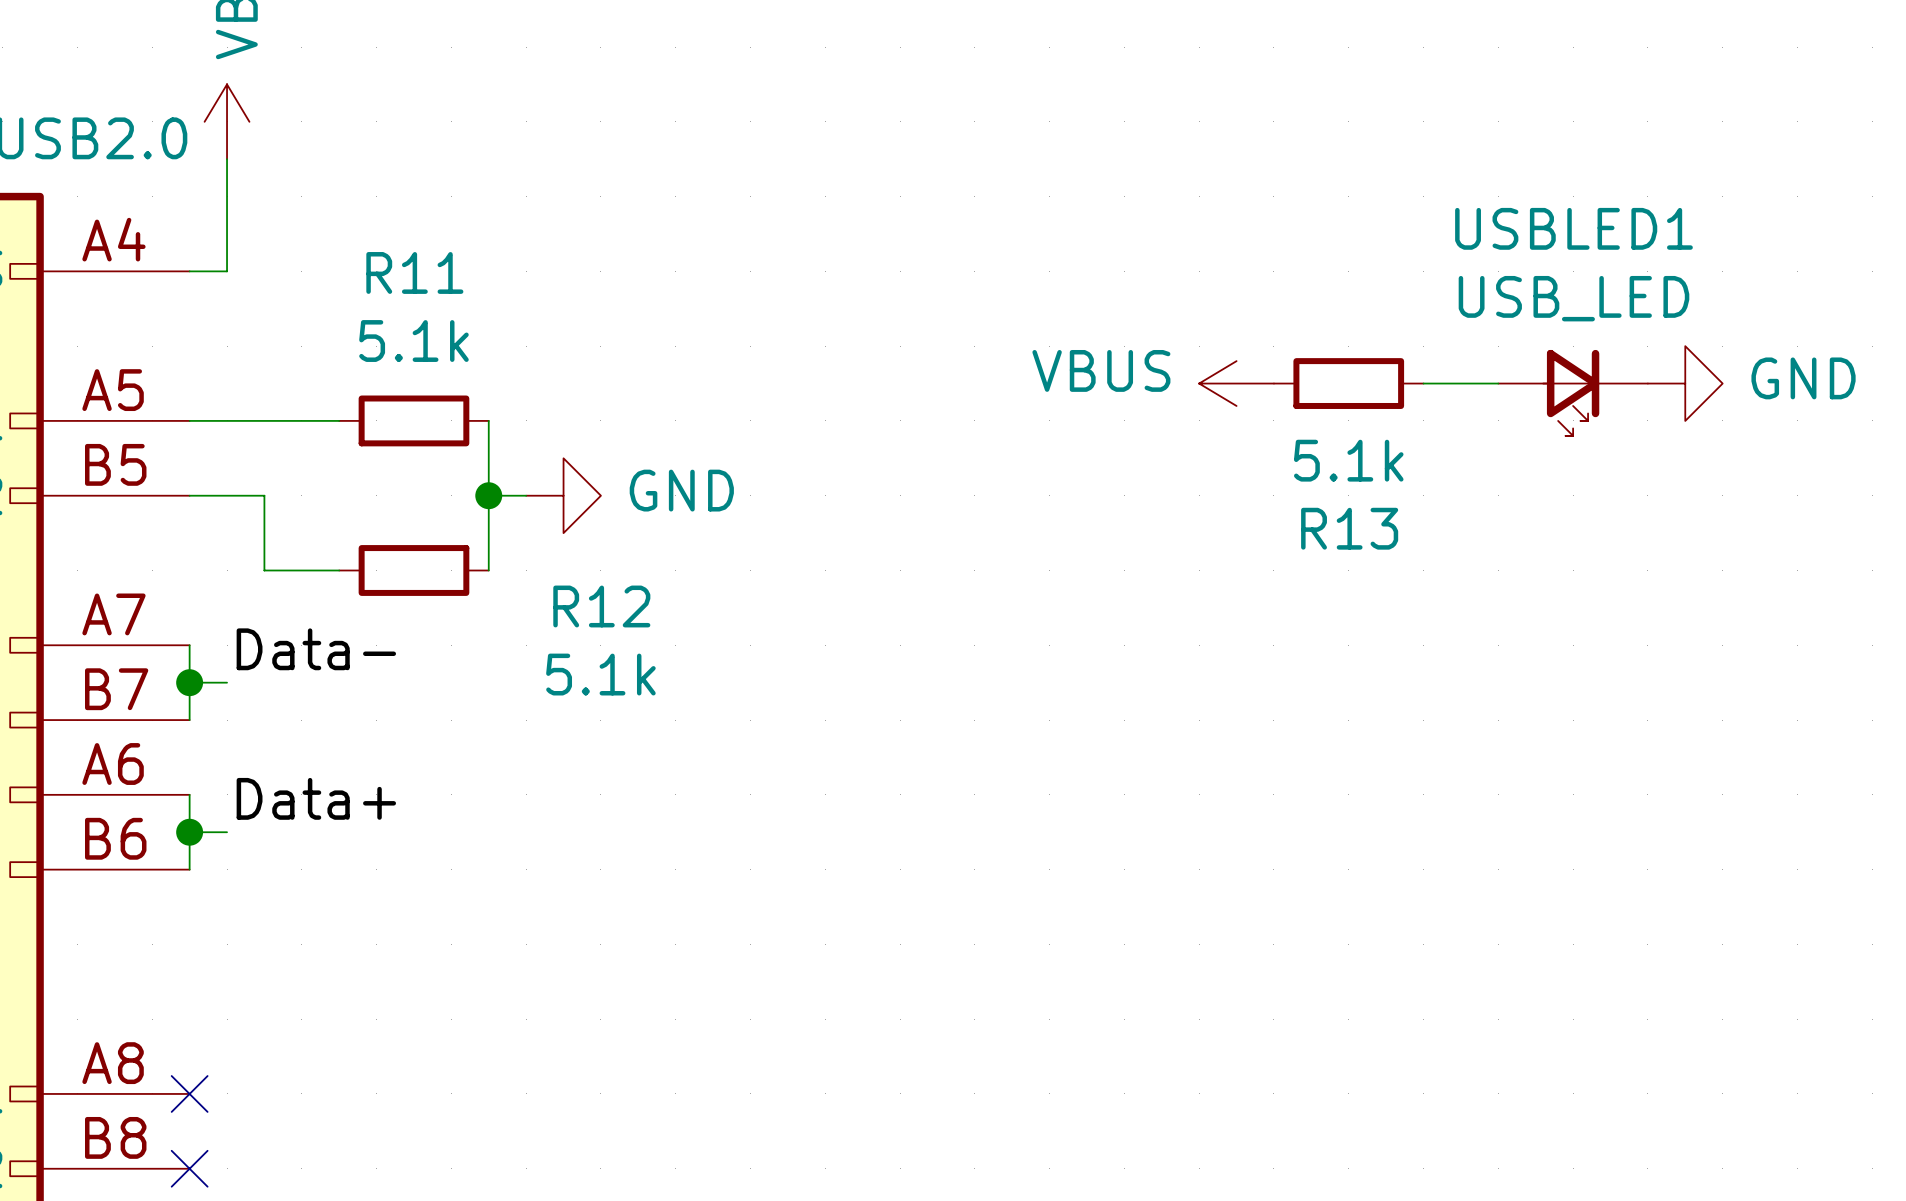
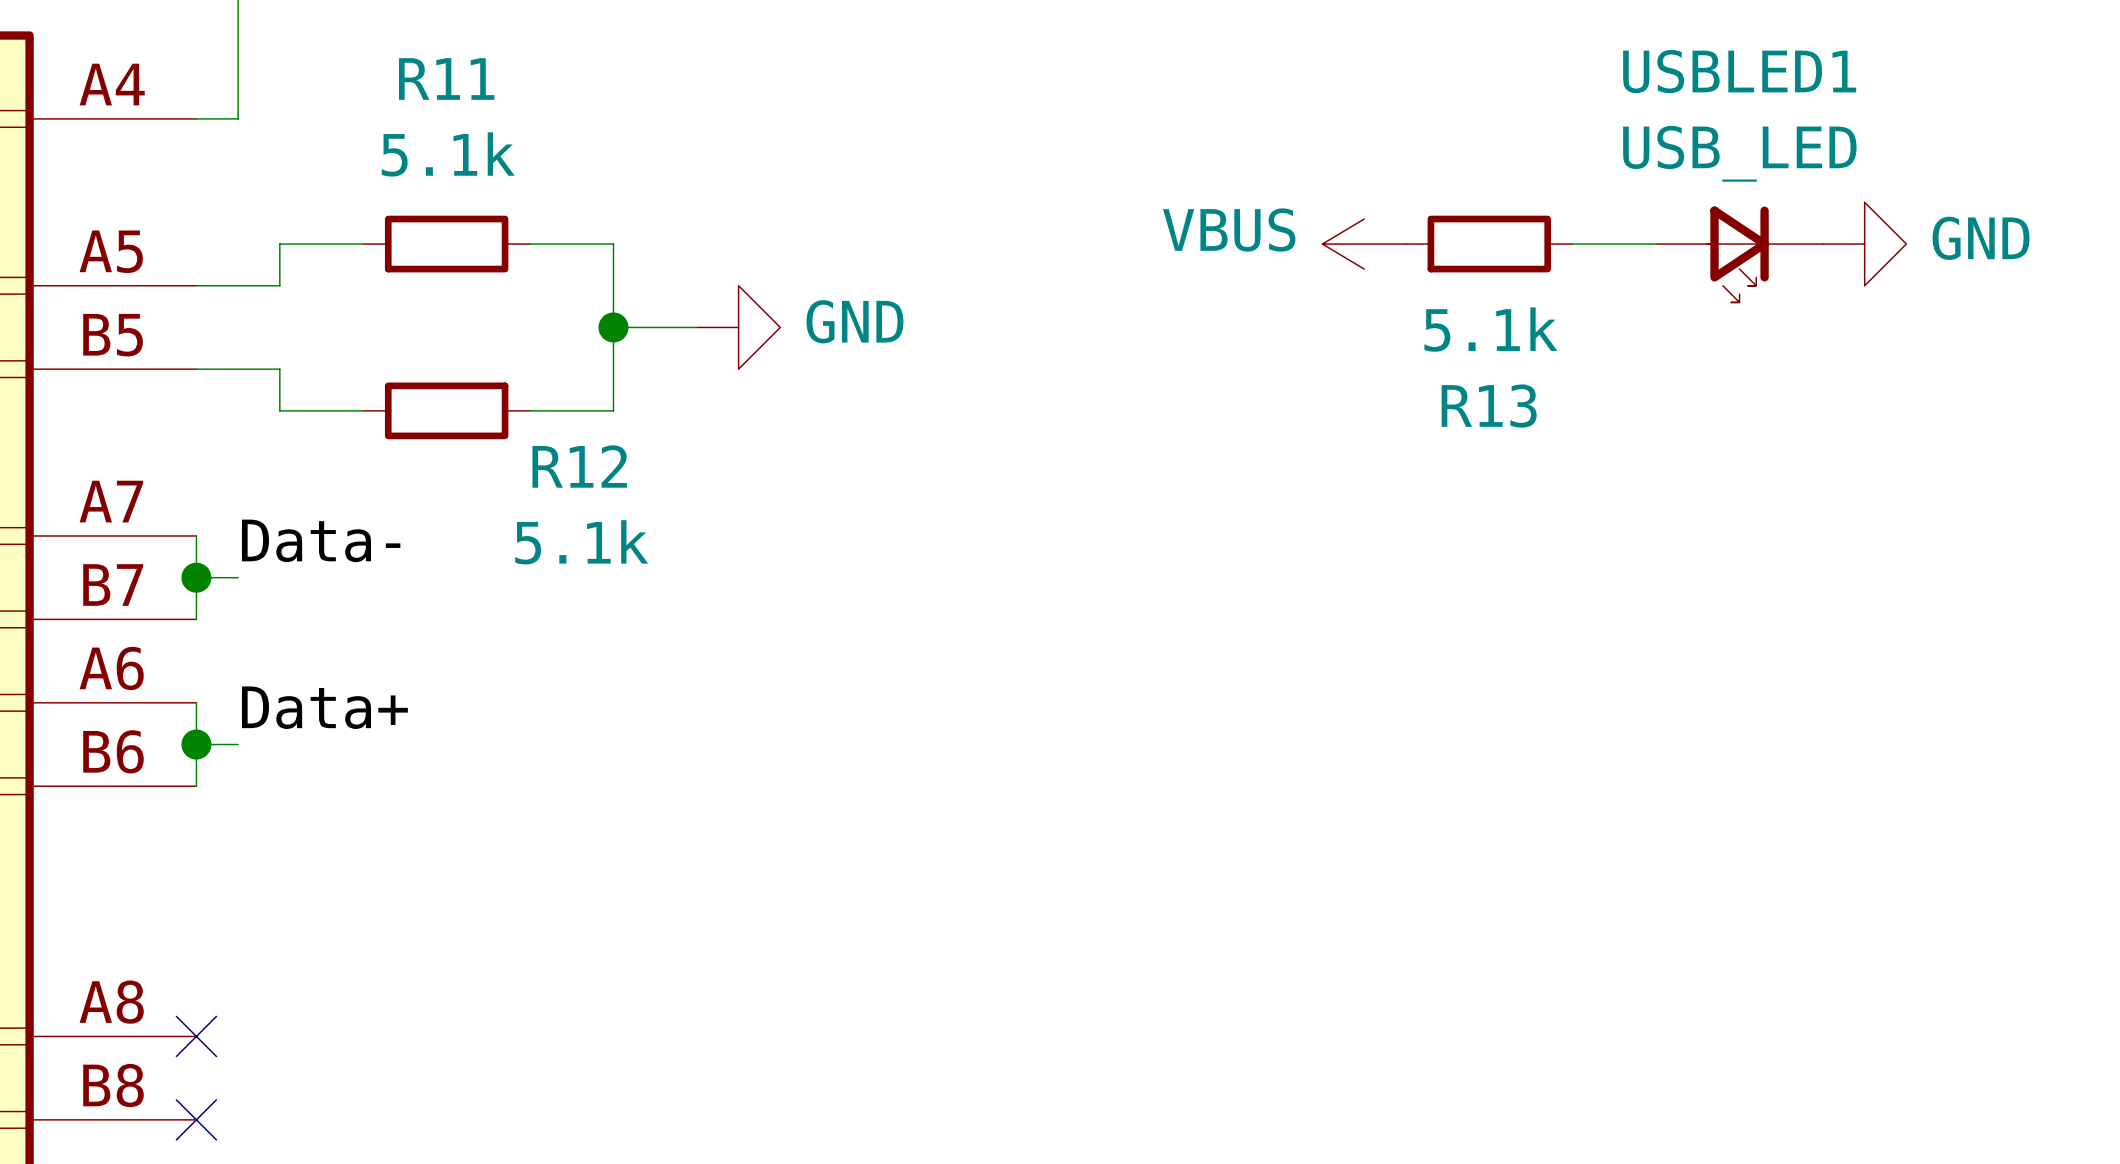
wire: none -> (530, 244) (613, 244) (613, 410) (530, 410)
wire: (264, 420) (339, 420) -> (279, 285) (279, 244) (363, 244)
R11 position: (413, 420) -> (446, 244)
wire: (488, 420) (488, 570) -> none
wire: none -> (613, 327) (696, 327)
wire: (488, 495) (526, 495) -> none
junction position: (488, 495) -> (613, 327)
power symbol position: GND (563, 495) -> GND (738, 327)
wire: (264, 533) (264, 570) (339, 570) -> (279, 410) (363, 410)
R12 position: (413, 570) -> (446, 410)
R12 name position: R12 (601, 606) -> R12 (579, 466)
R12 value position: 5.1k (600, 674) -> 5.1k (581, 542)

